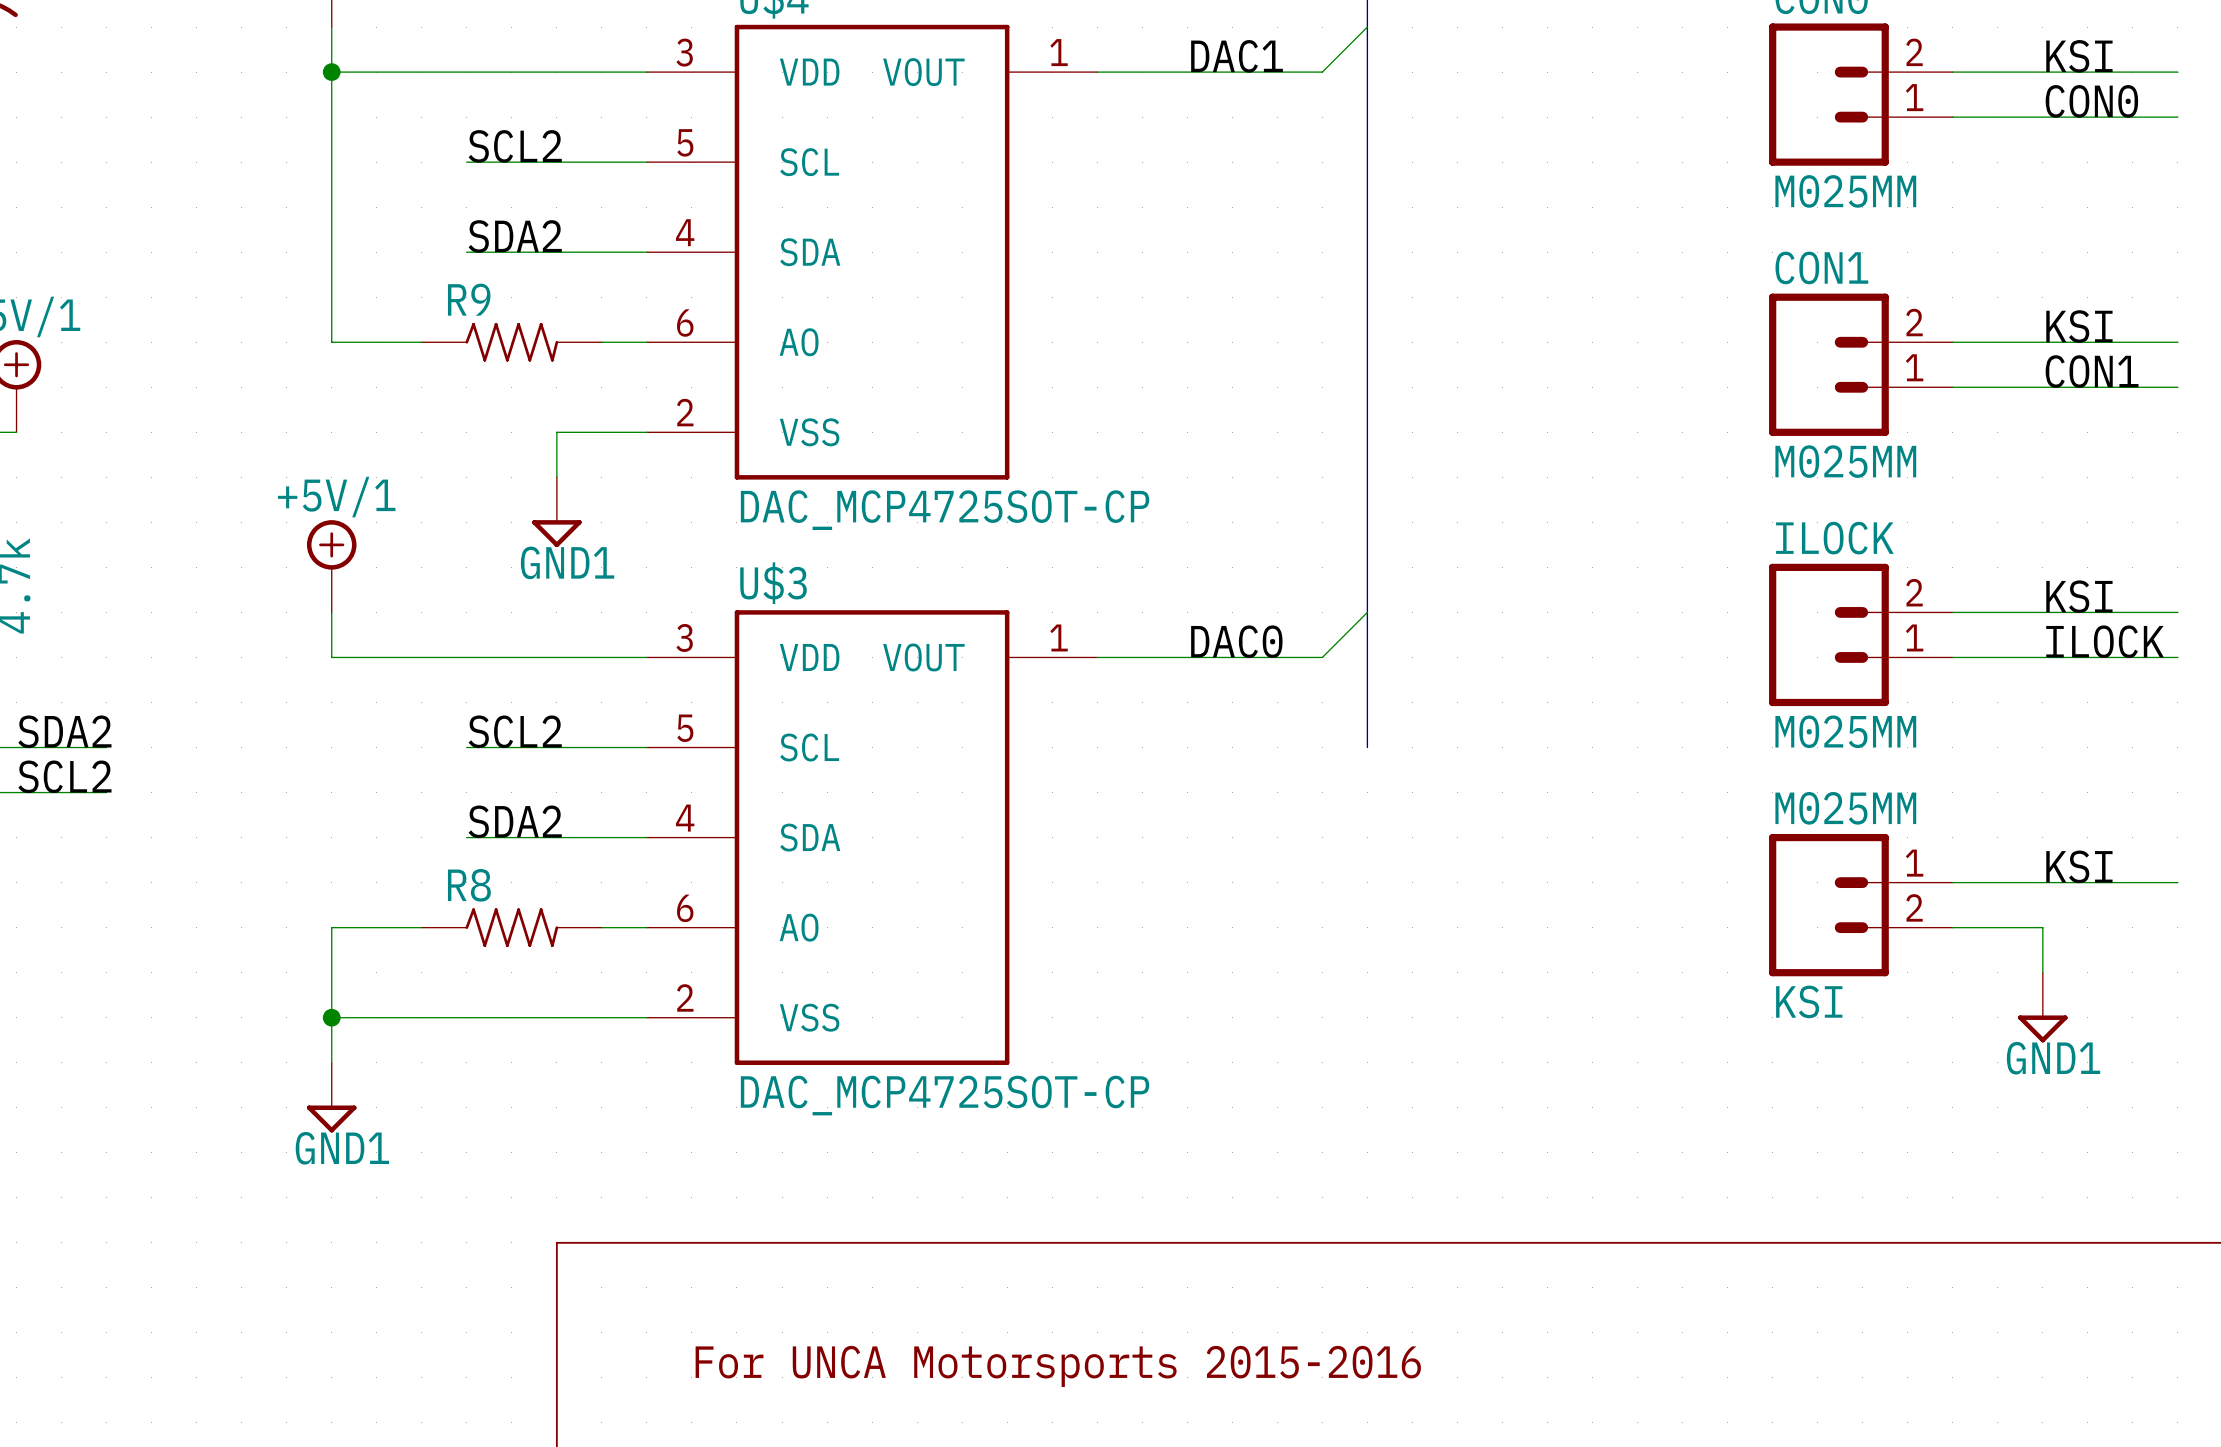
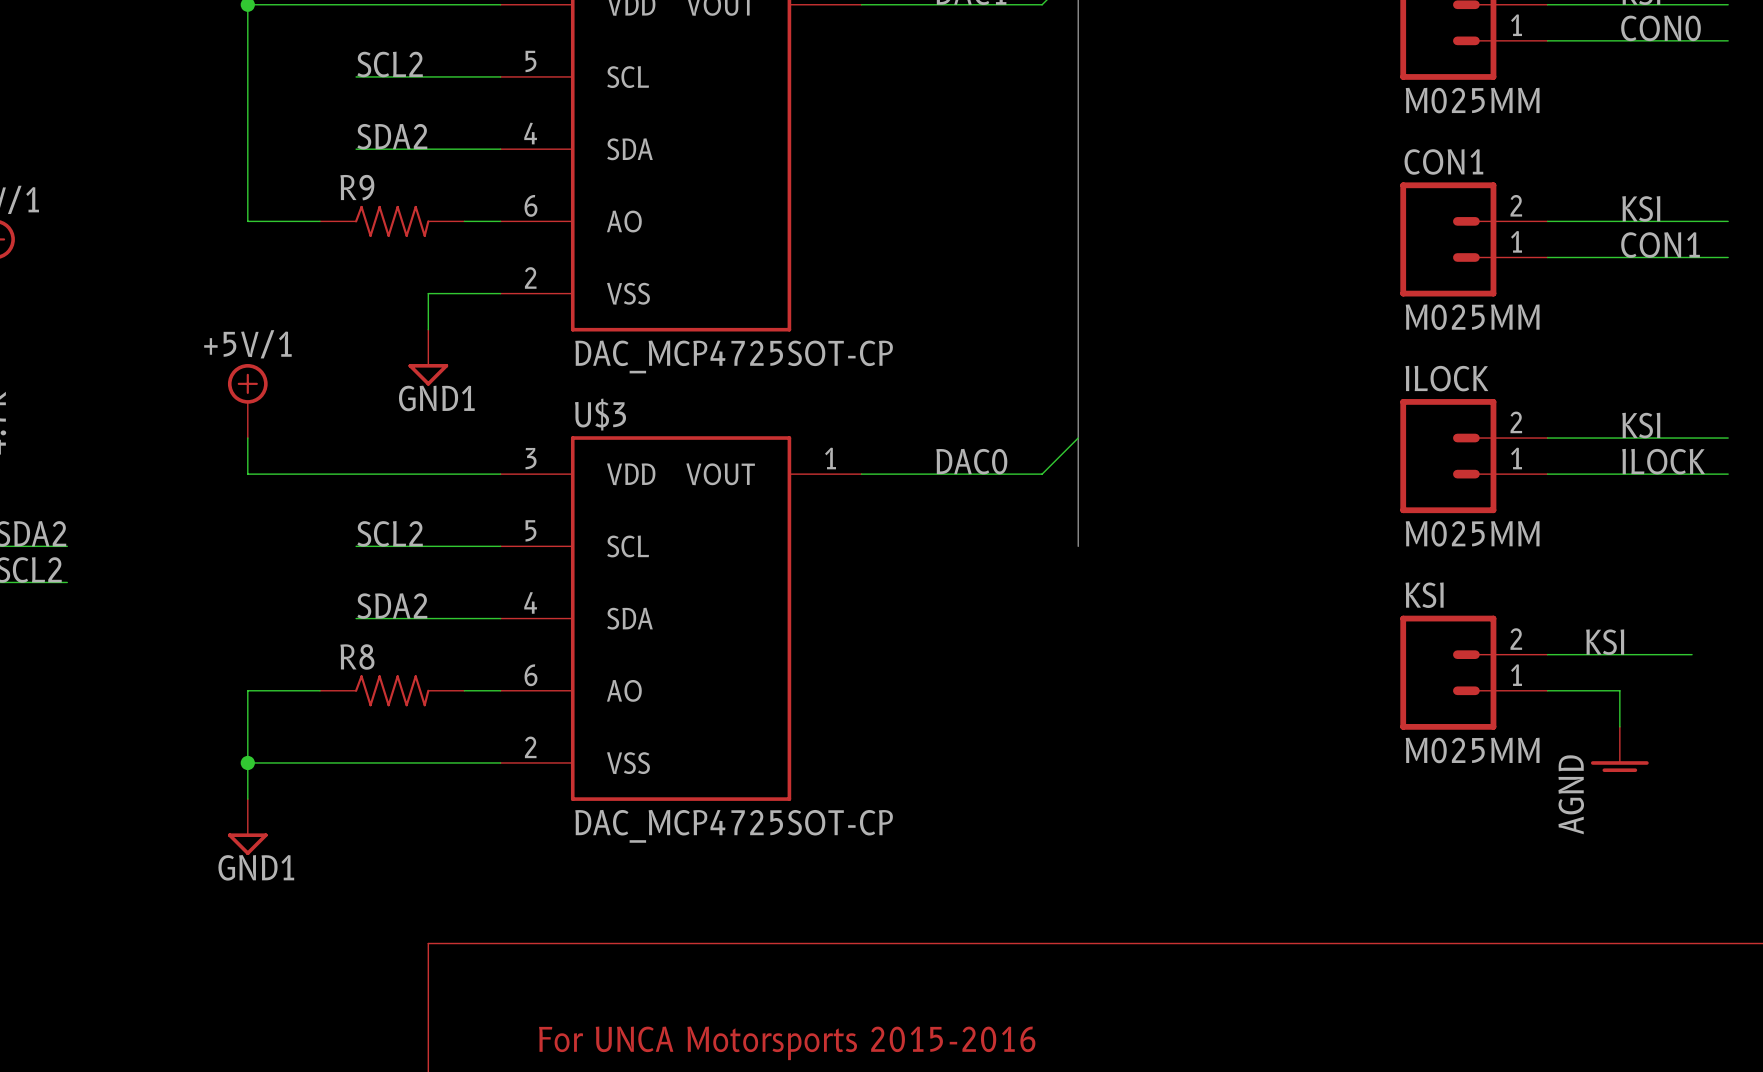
label position: KSI (2079, 866) -> KSI (1605, 642)
wire: (2132, 882) (2177, 882) -> none
KSI flip: as is (1828, 905) -> up-down (1448, 672)
power symbol: GND1 (2042, 1007) -> AGND (1619, 749)

